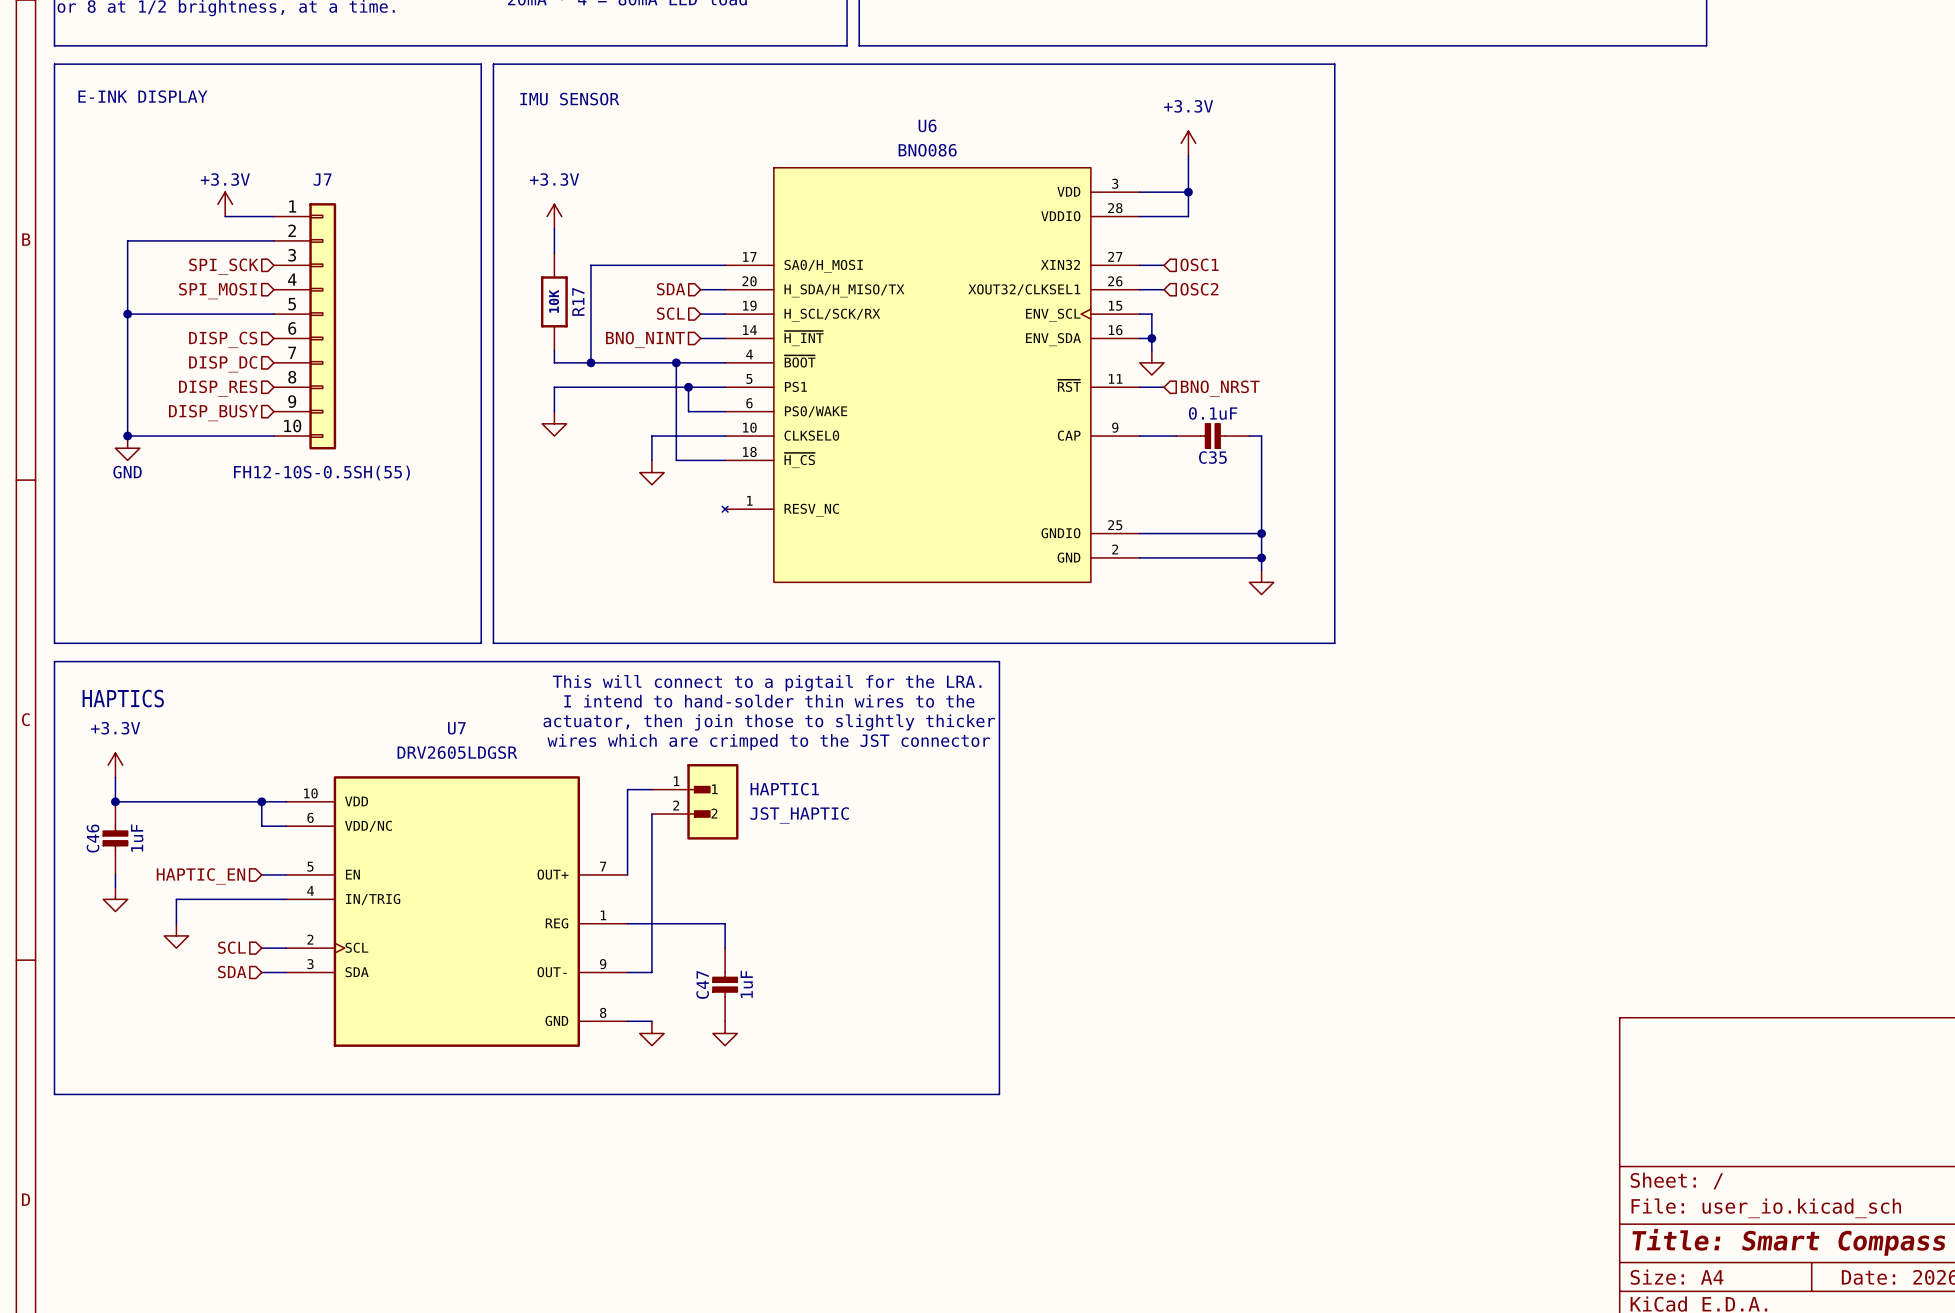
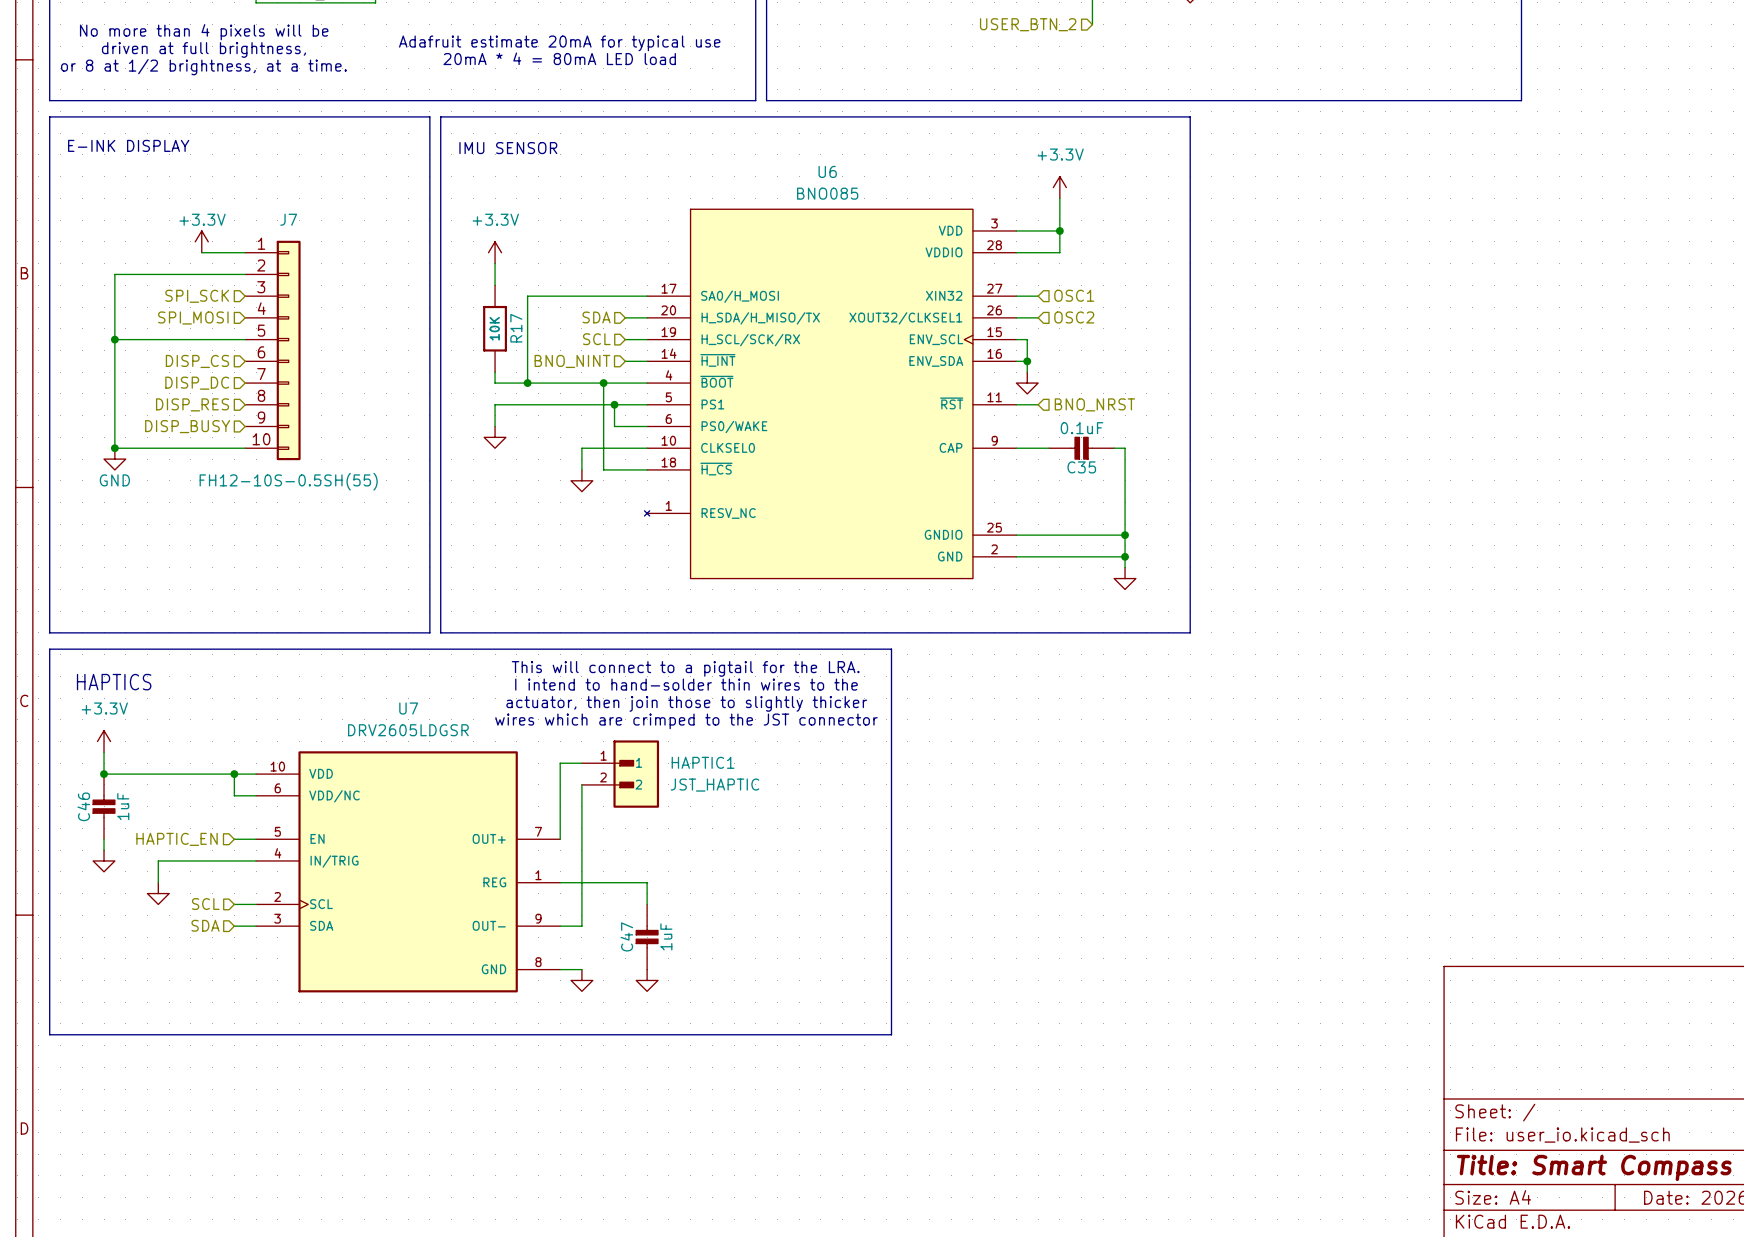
U6 value: BNO086 (927, 150) -> BNO085 (827, 193)

